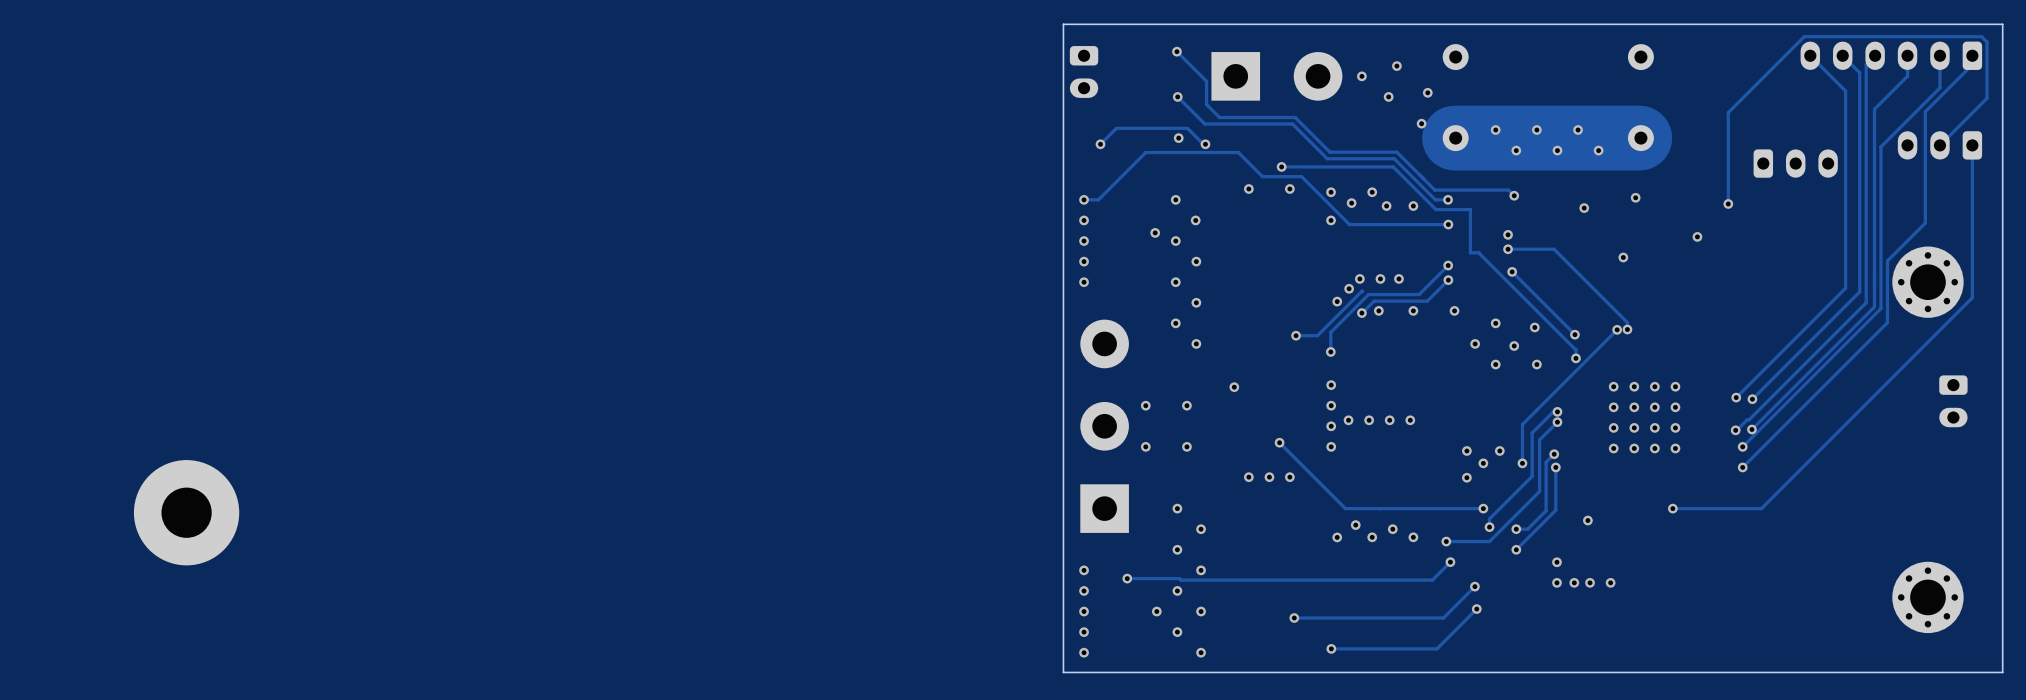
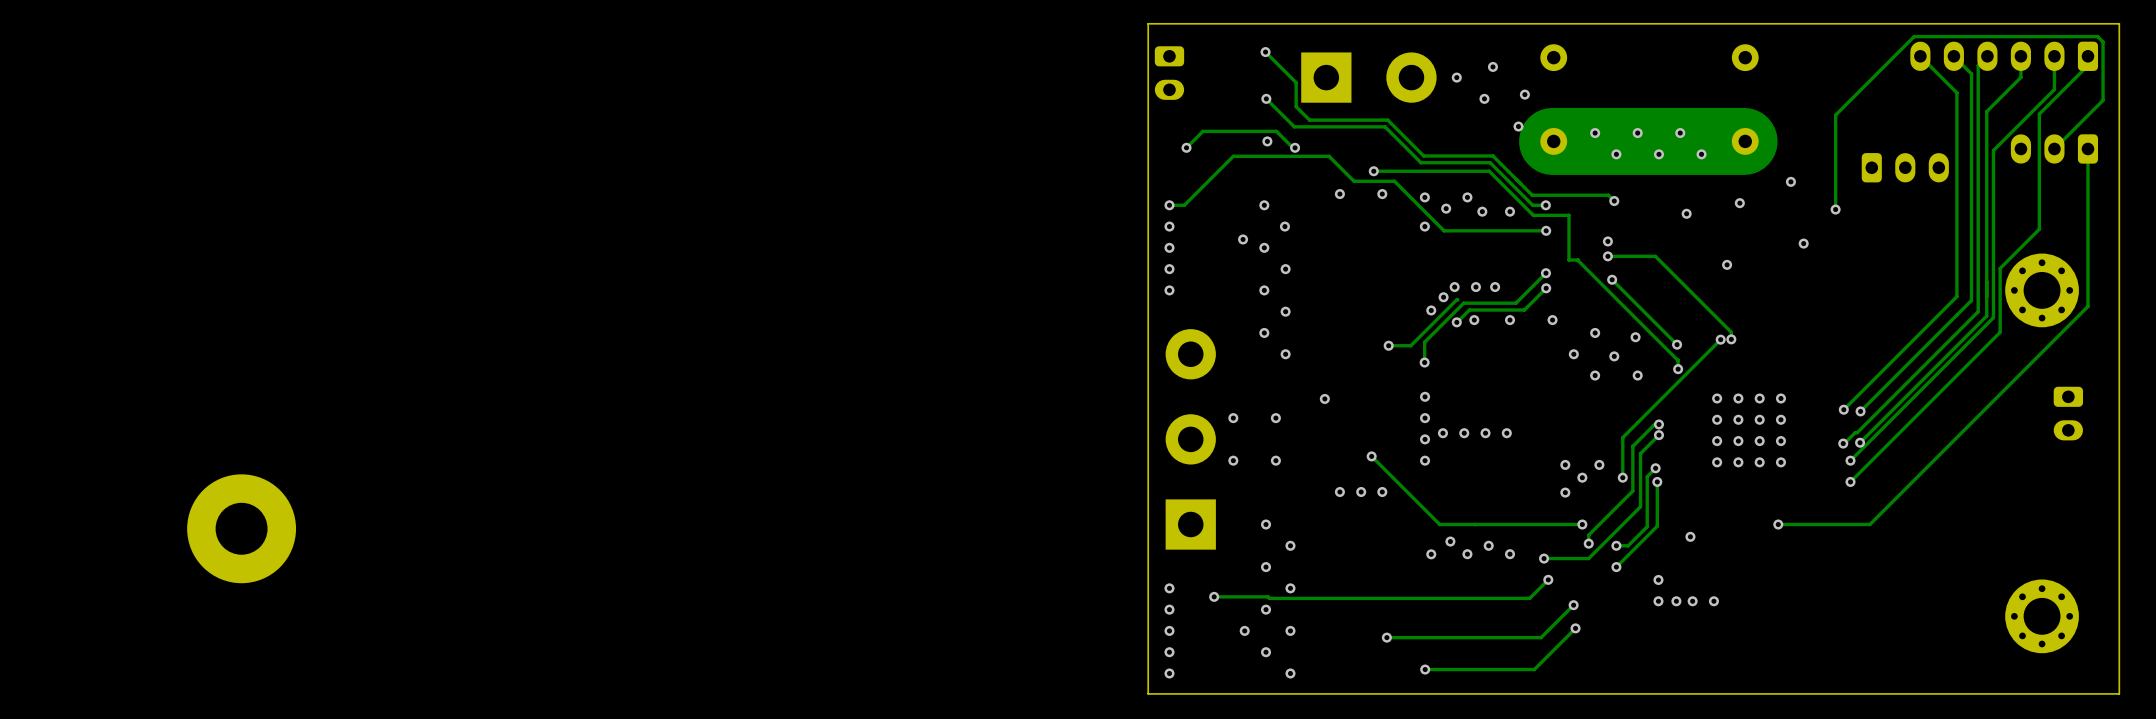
via: none -> (1790, 181)

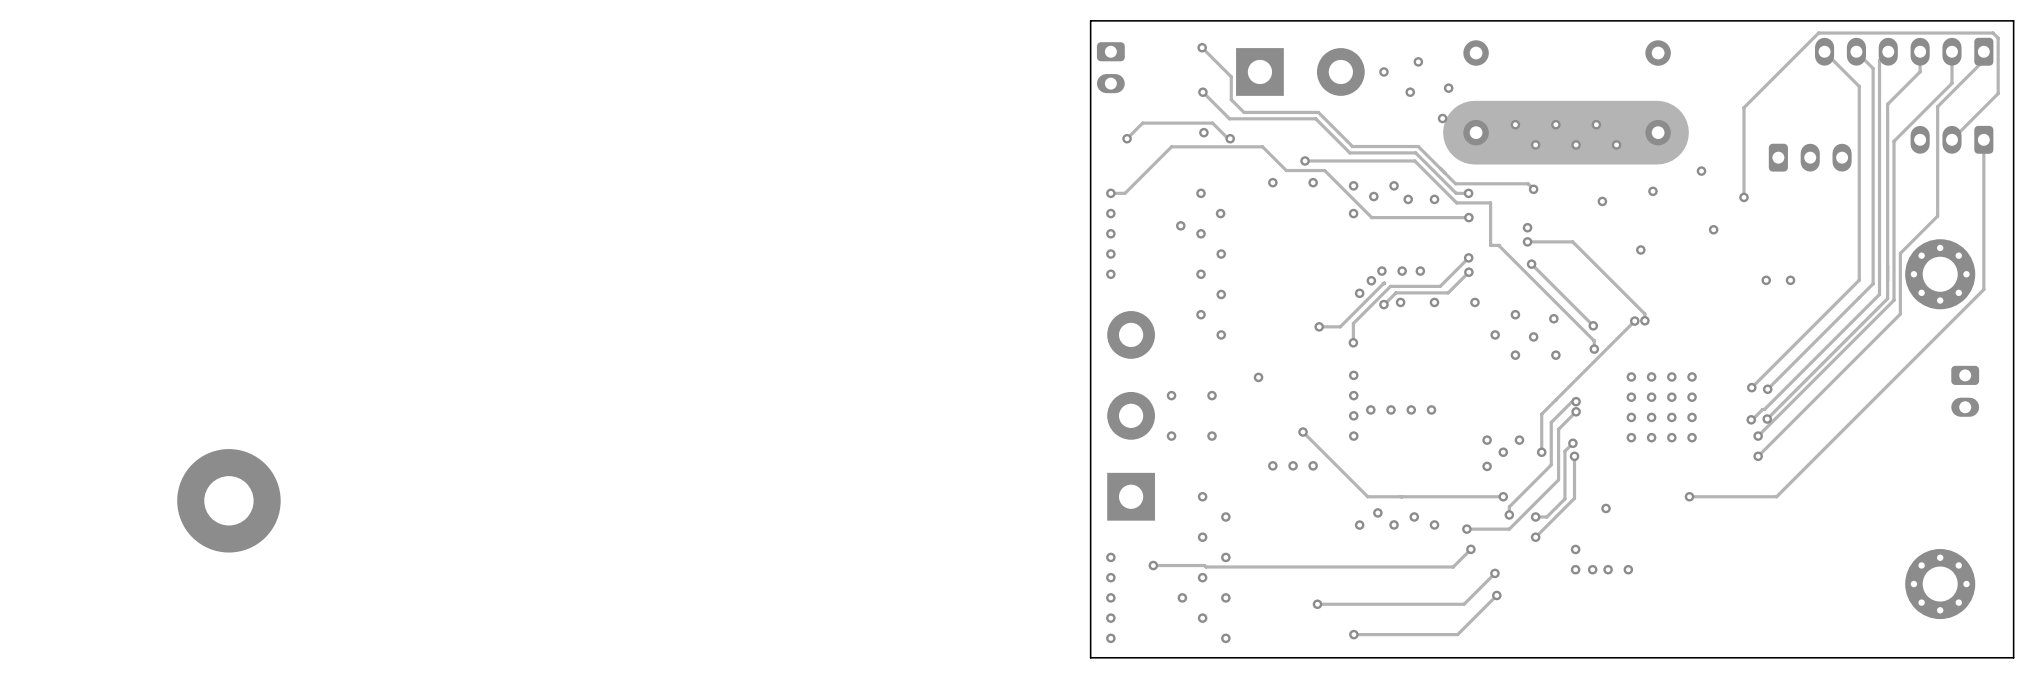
via: none -> (1766, 280)
via: none -> (1790, 280)

